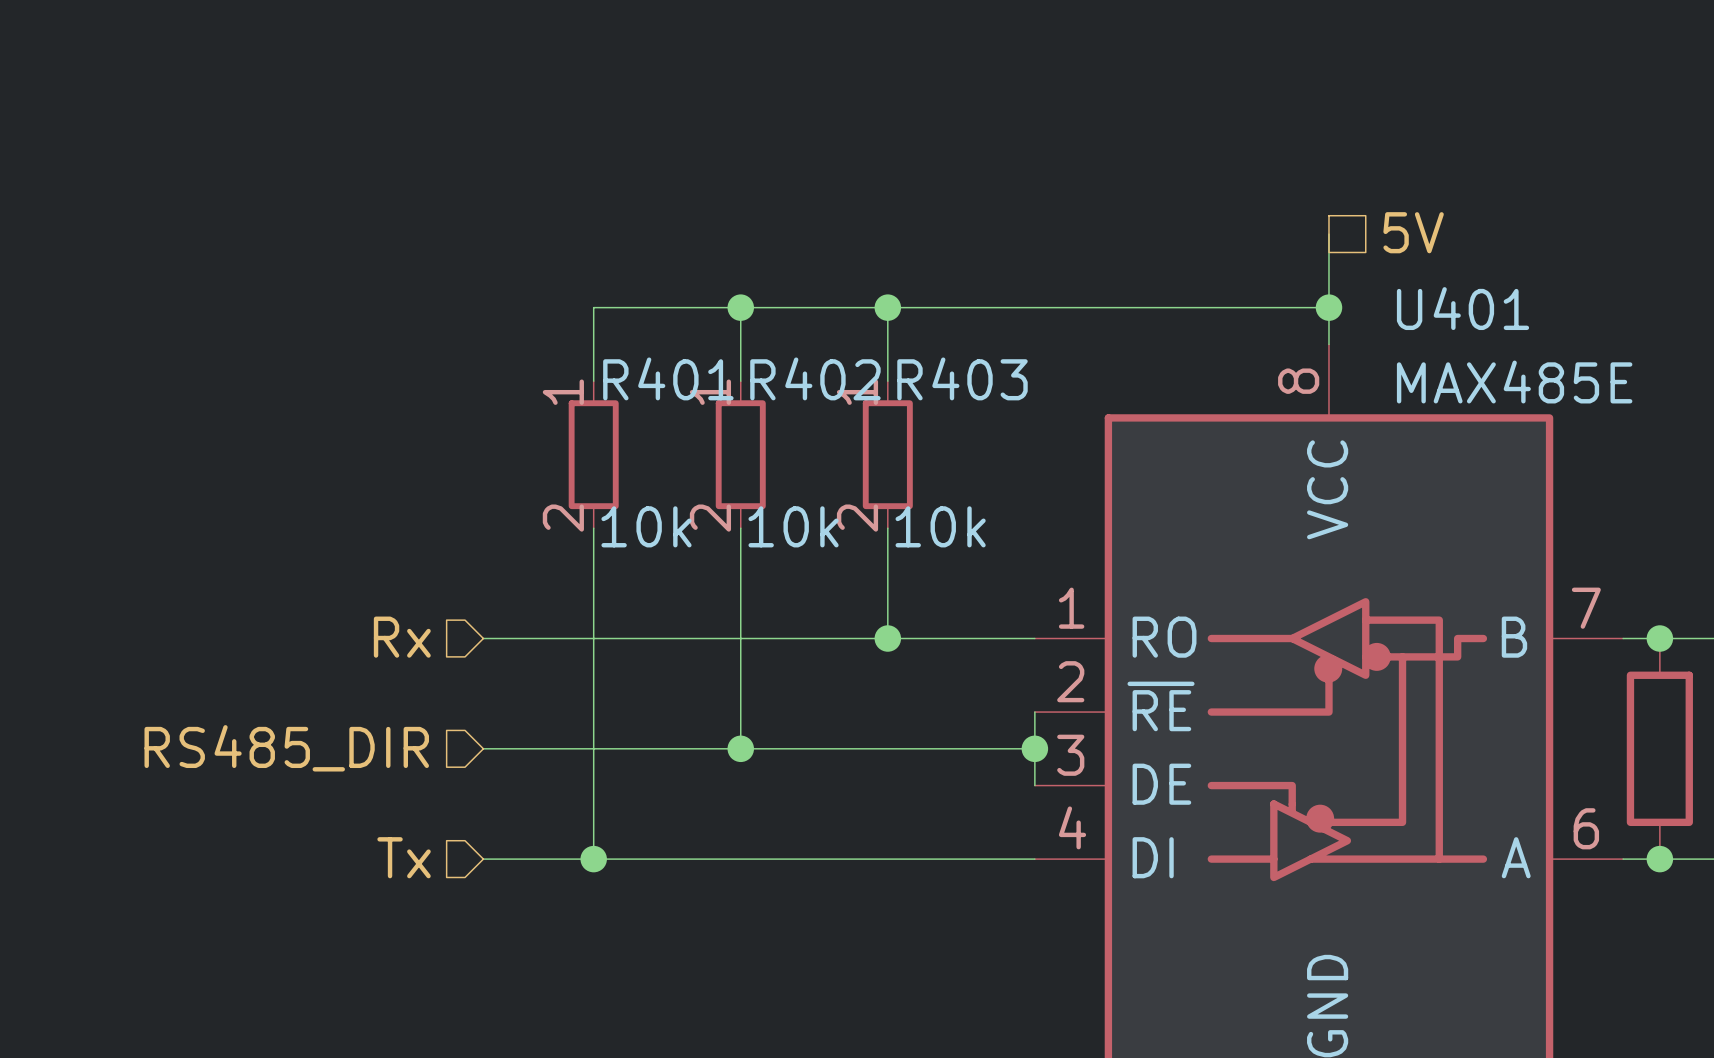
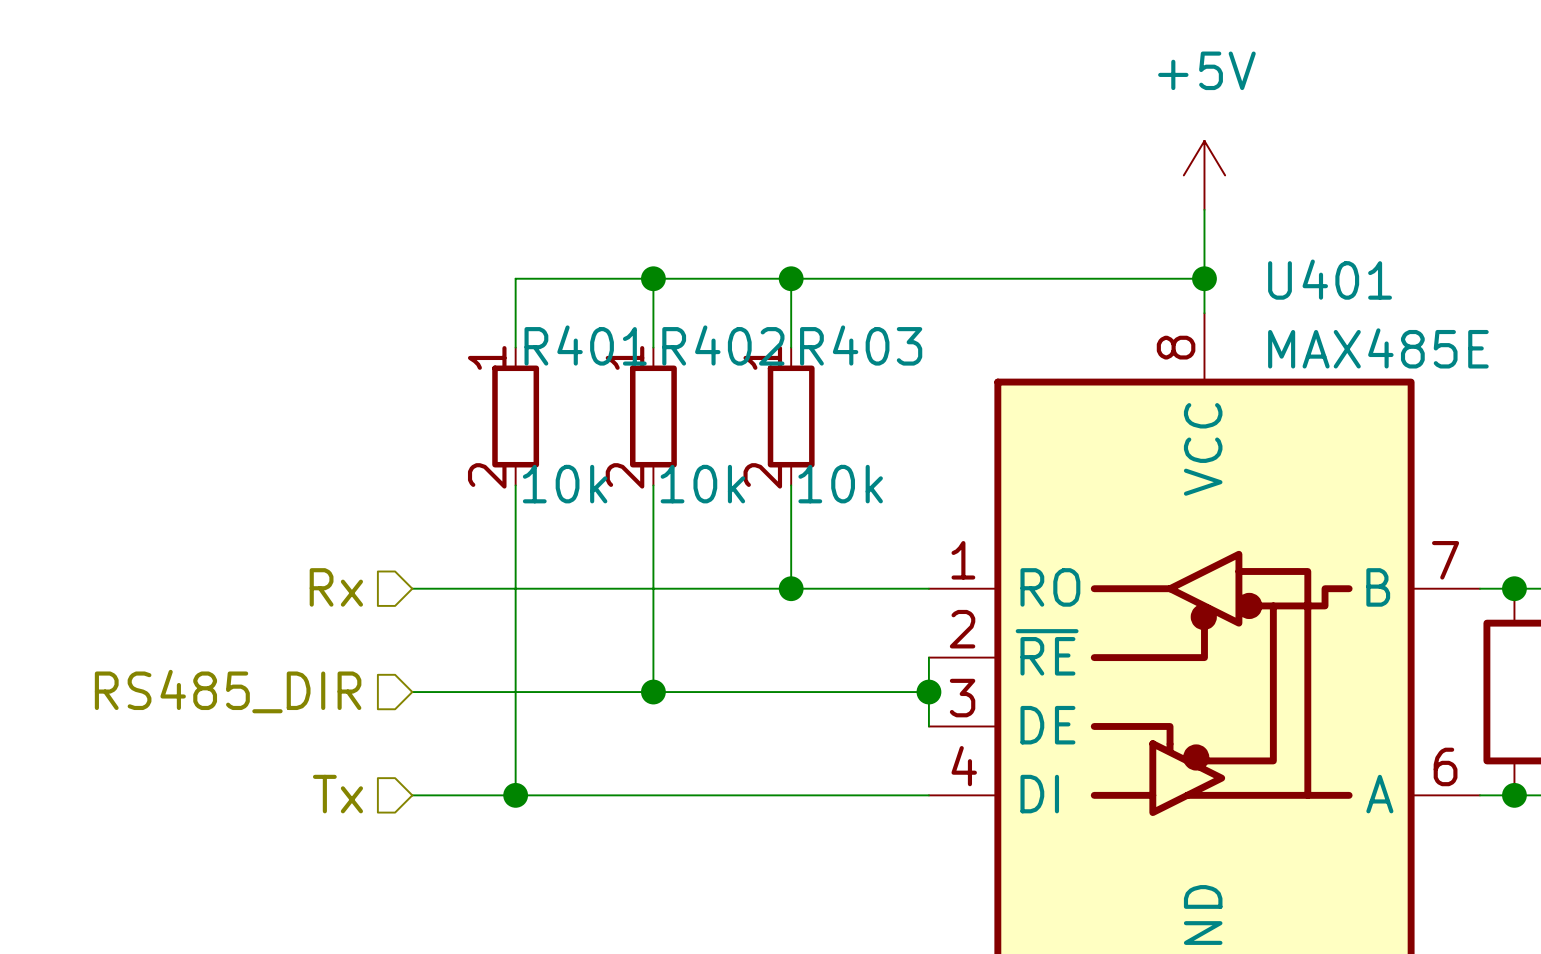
power symbol: none -> +5V (1204, 175)
hierarchical label: 5V (1413, 232) -> none

